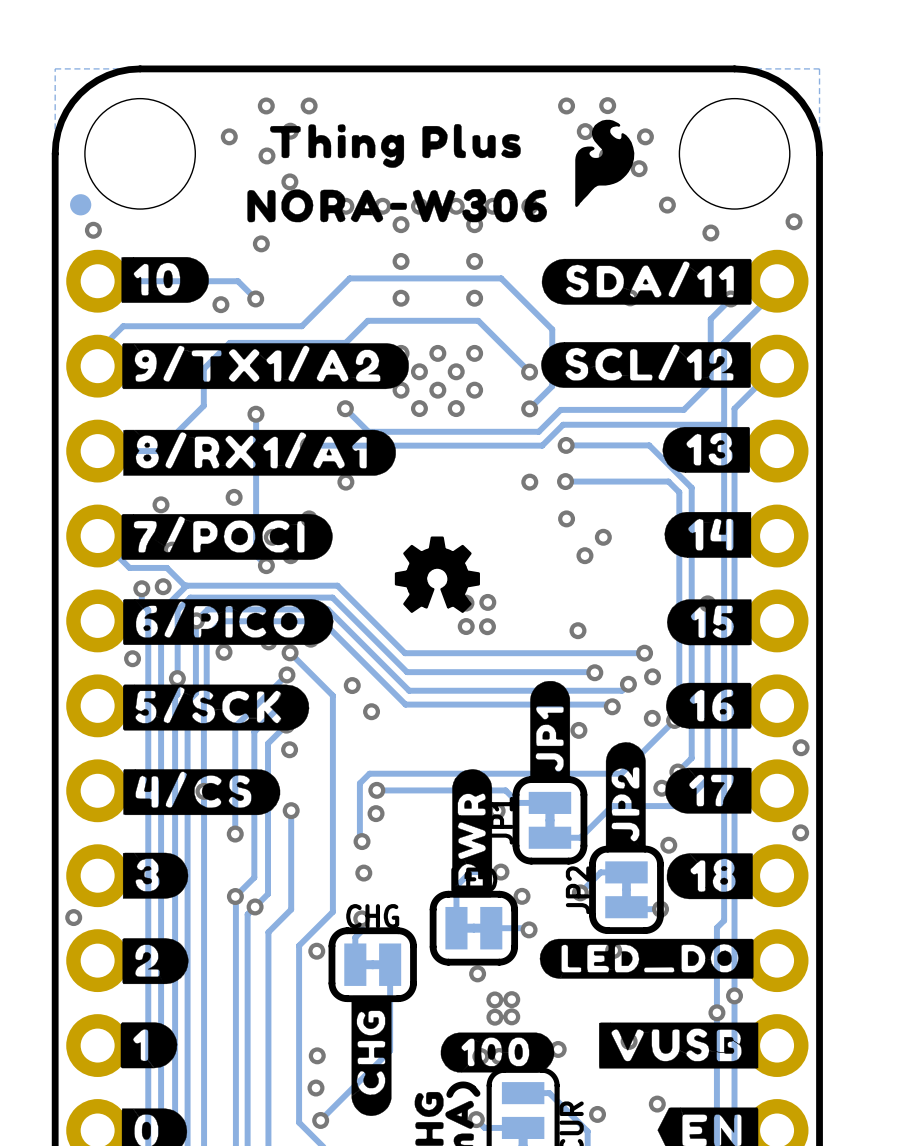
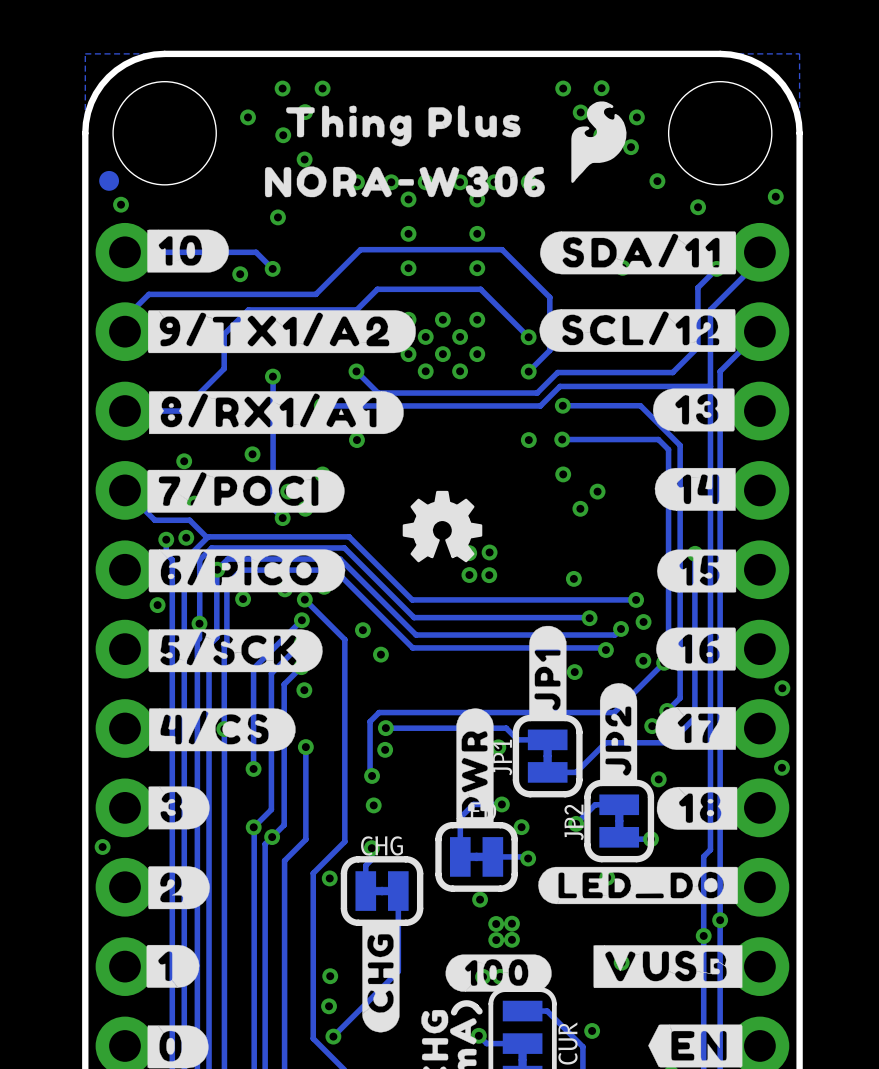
via: (558, 1049) -> none
via: (657, 1104) -> none

